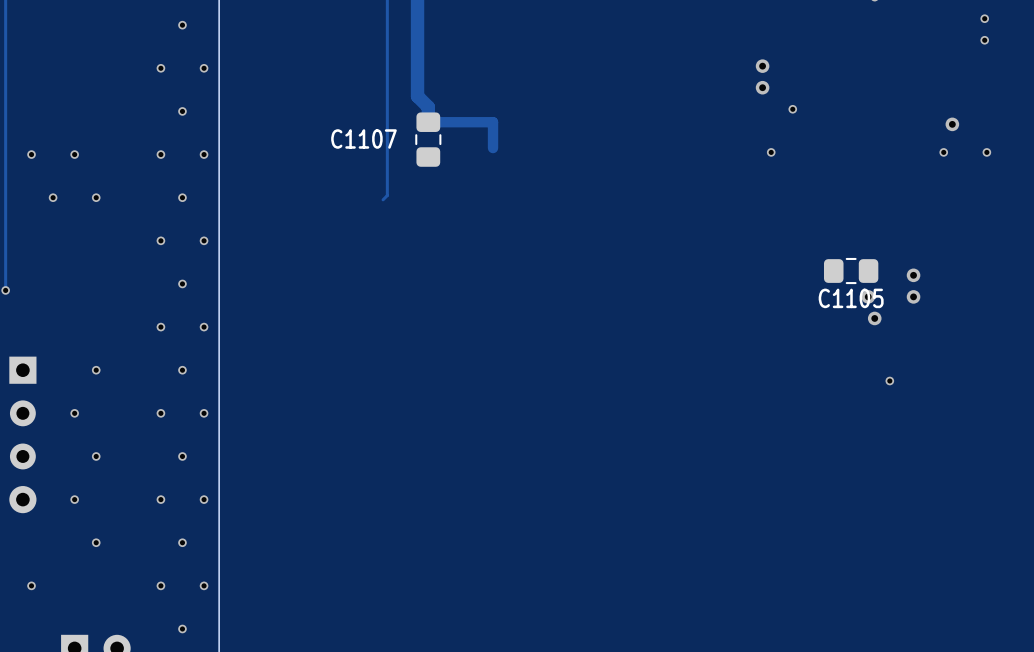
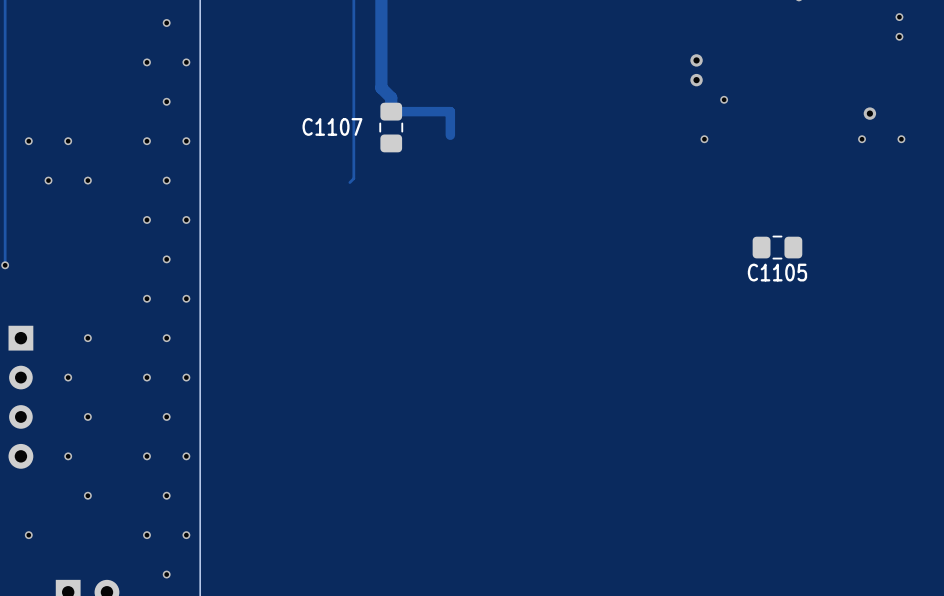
via: (913, 275) -> none
via: (868, 296) -> none
via: (913, 296) -> none
via: (874, 318) -> none
via: (889, 380) -> none

